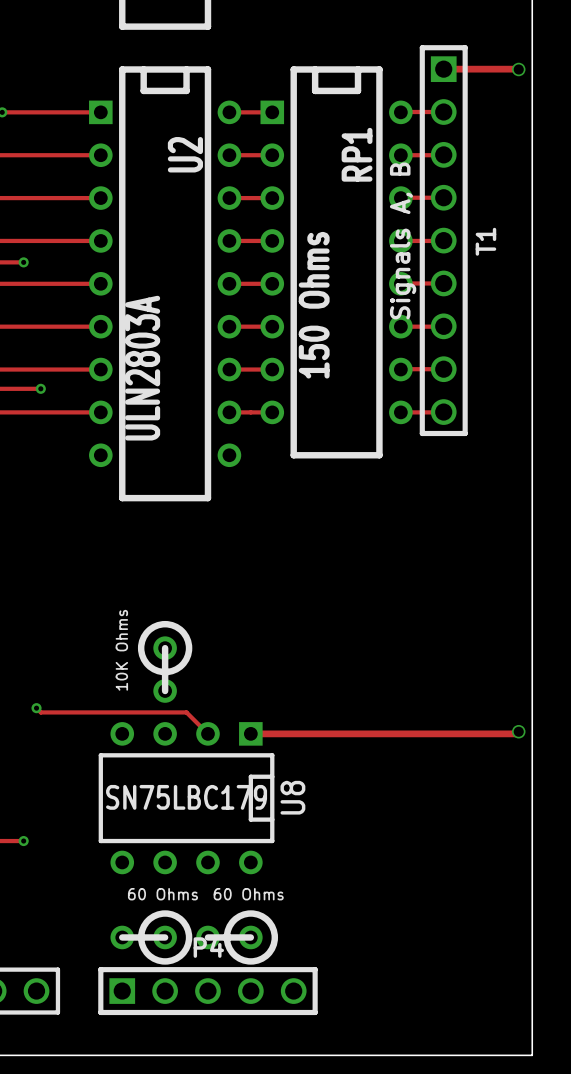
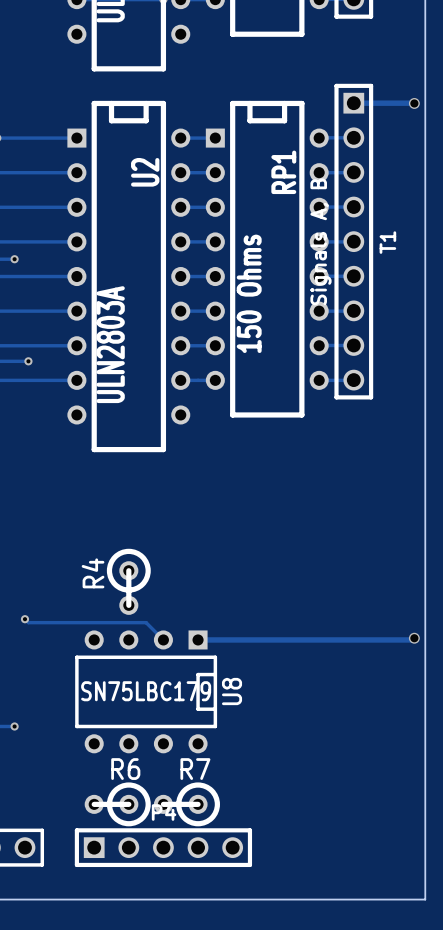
R4 value: 10K Ohms (121, 650) -> none
R4 name: none -> R4 (93, 573)
R6 name: none -> R6 (125, 769)
R7 name: none -> R7 (195, 769)
R6 value: 60 Ohms (162, 894) -> none
R7 value: 60 Ohms (248, 894) -> none

